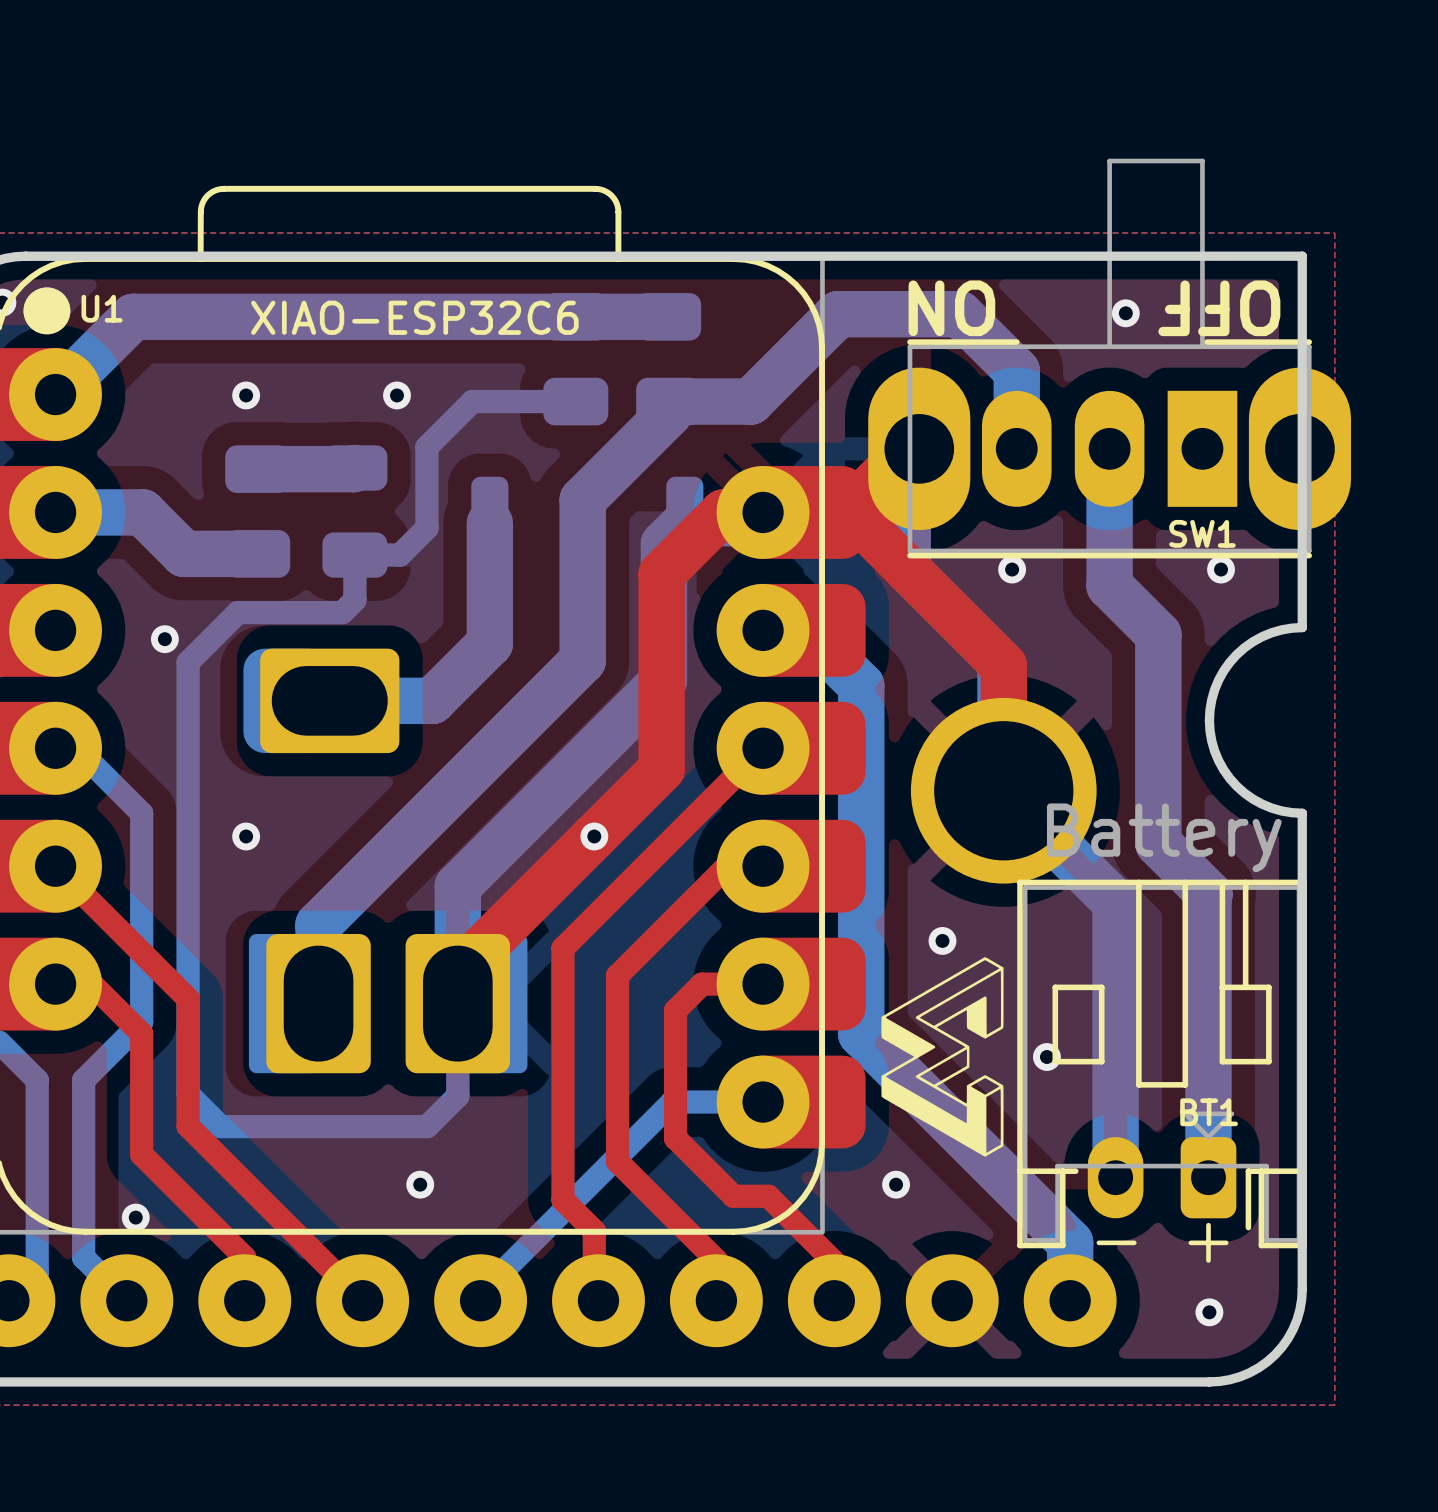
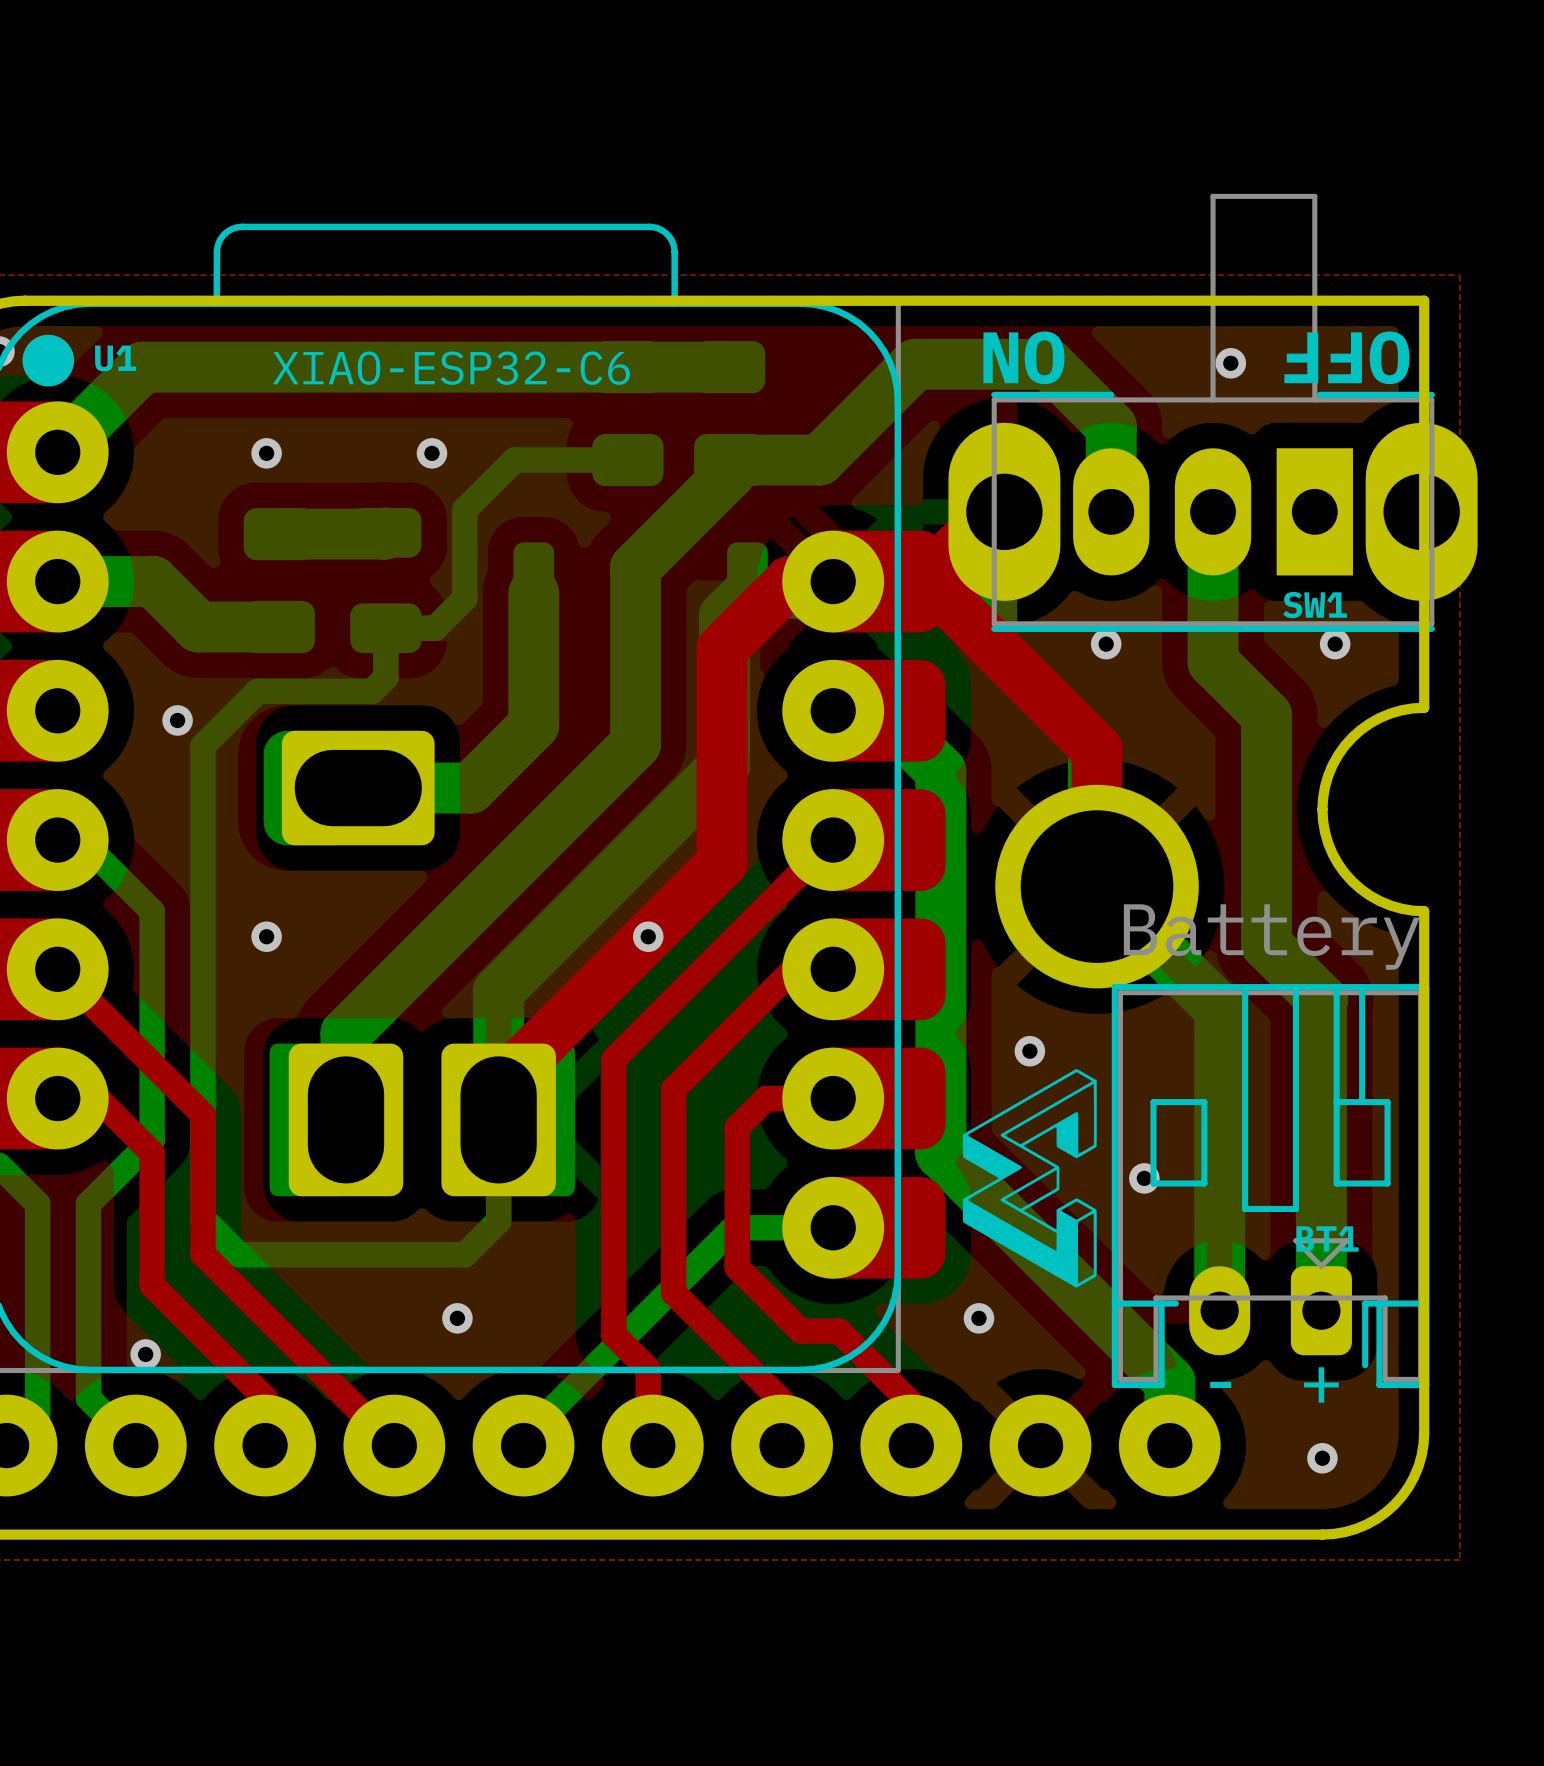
U1 value: XIAO-ESP32C6 (414, 317) -> XIAO-ESP32-C6 (451, 368)

